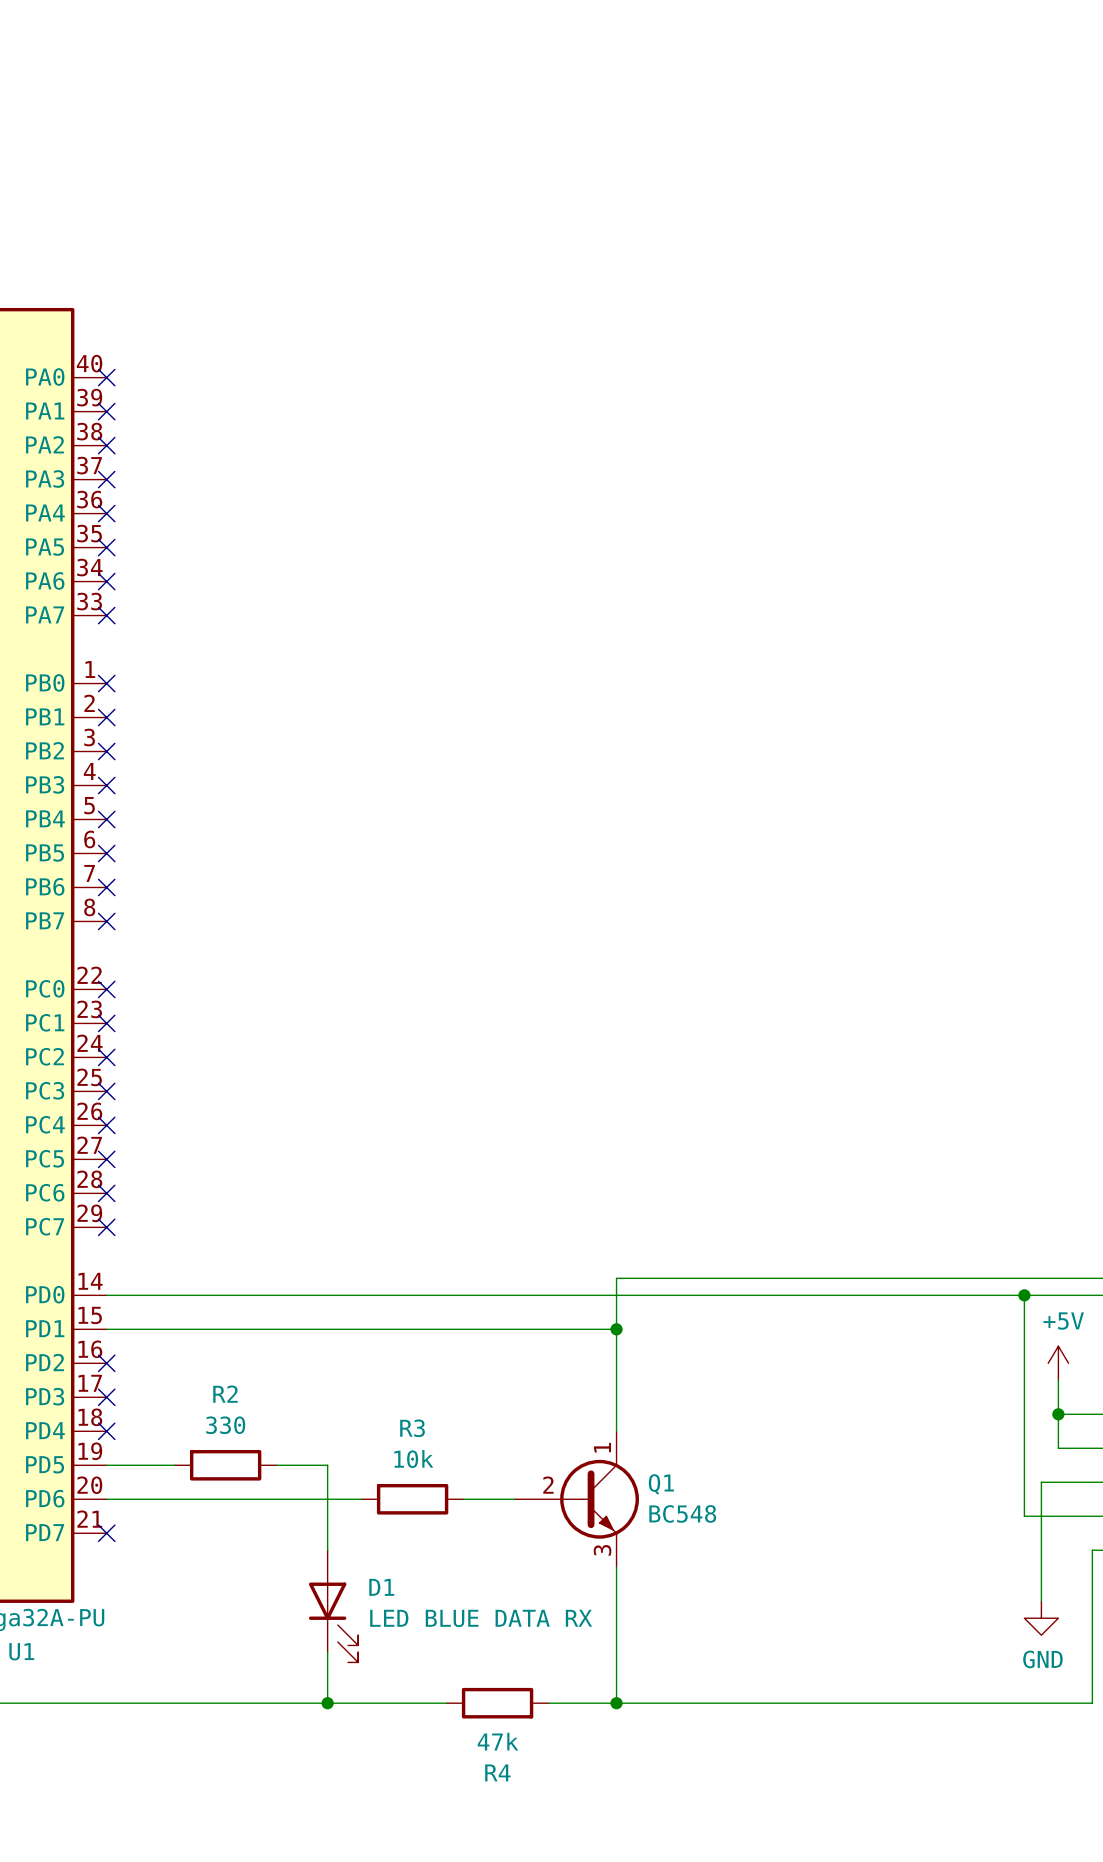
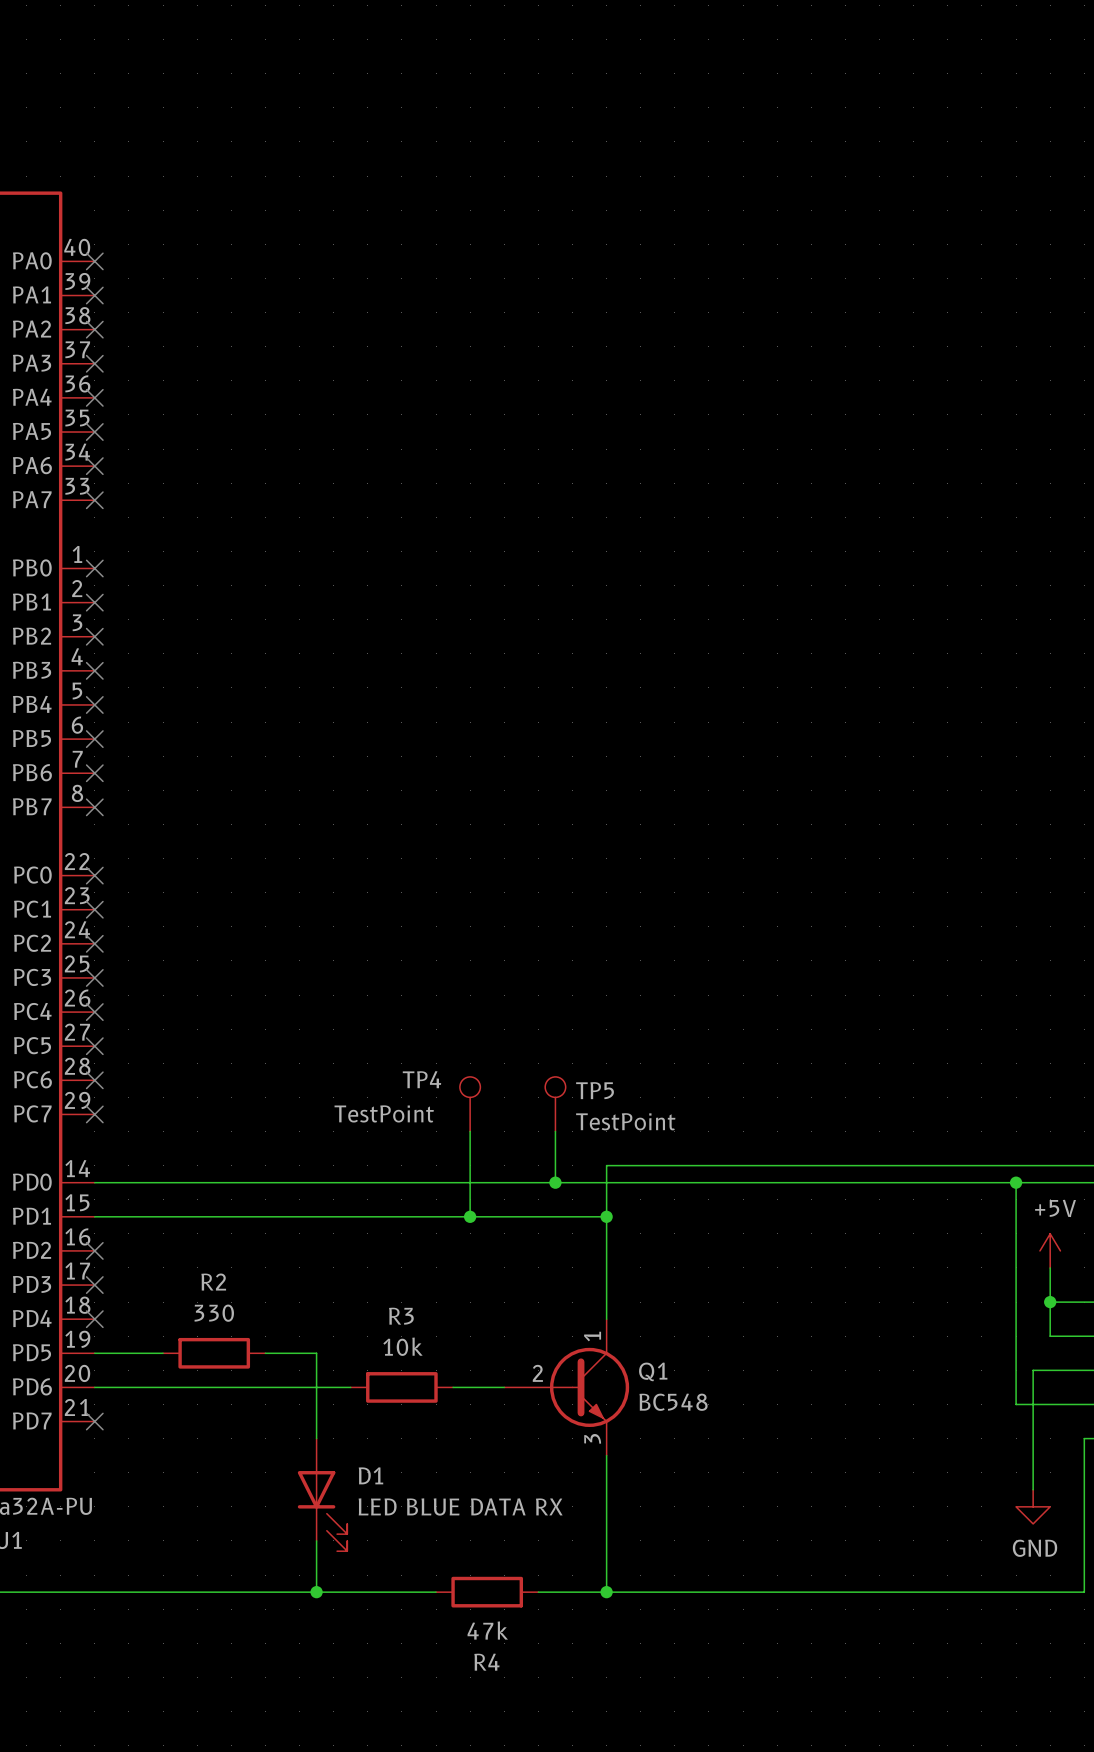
TP4: none -> TestPoint (470, 1104)
TP5: none -> TestPoint (555, 1104)
wire: none -> (470, 1131) (470, 1216)
wire: none -> (555, 1131) (555, 1182)
junction: none -> (555, 1182)
junction: none -> (470, 1216)

